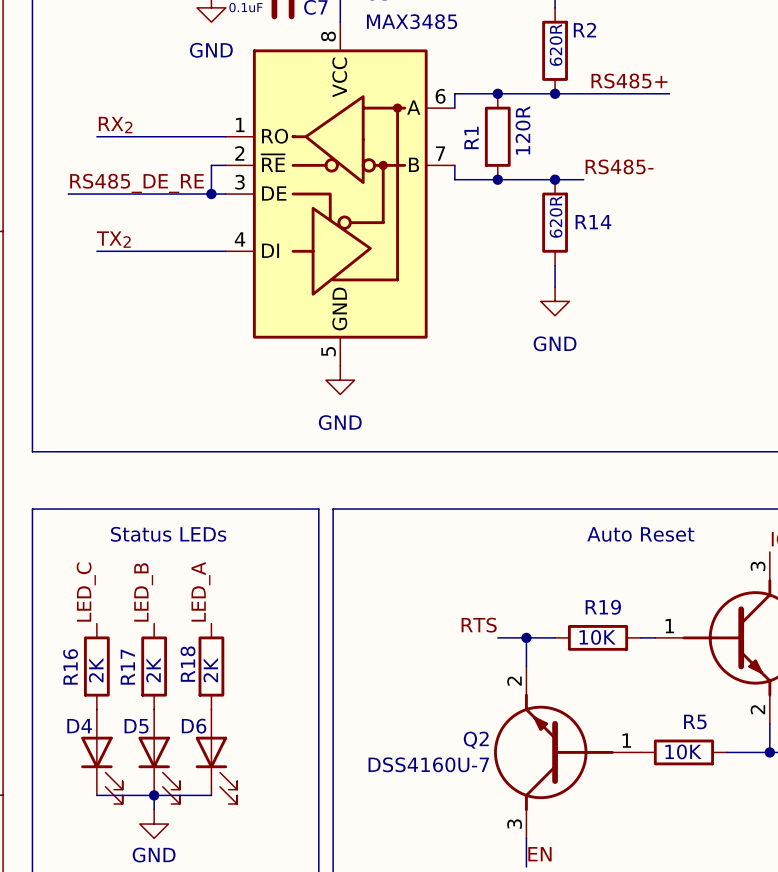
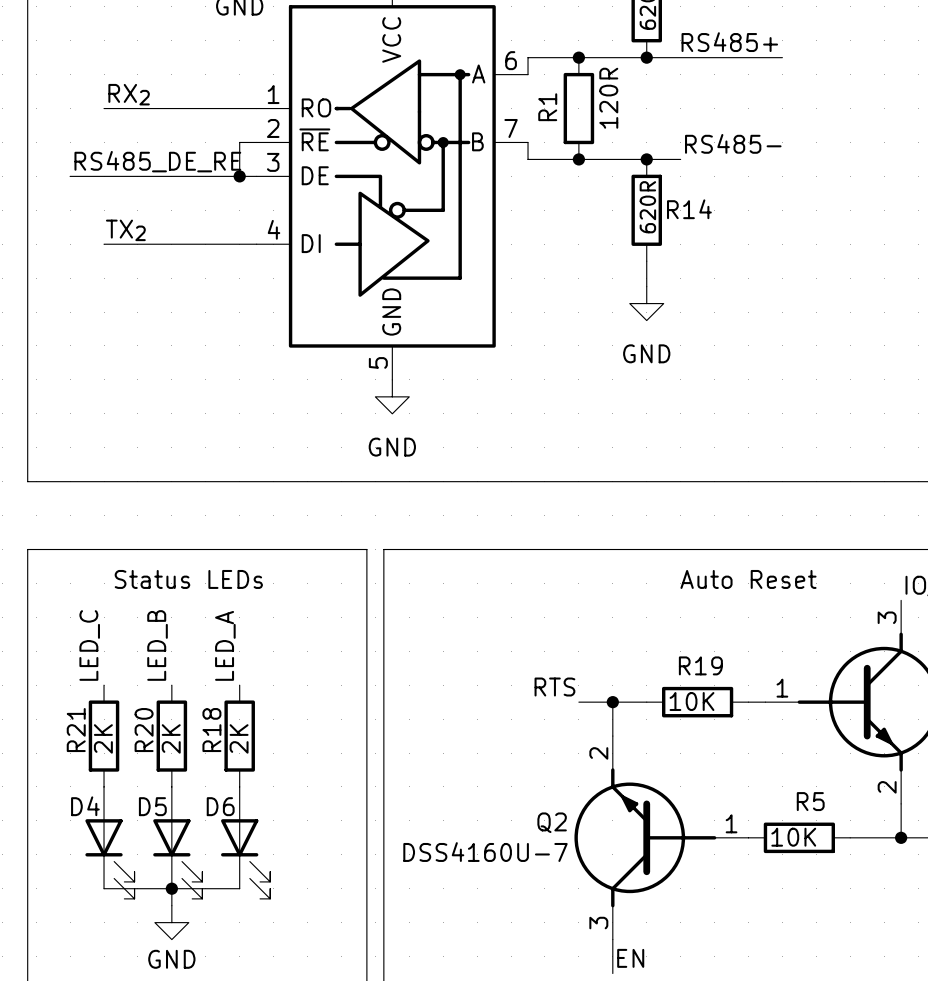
R16 name: R16 (70, 666) -> R21 (76, 730)
R17 name: R17 (127, 667) -> R20 (144, 730)

